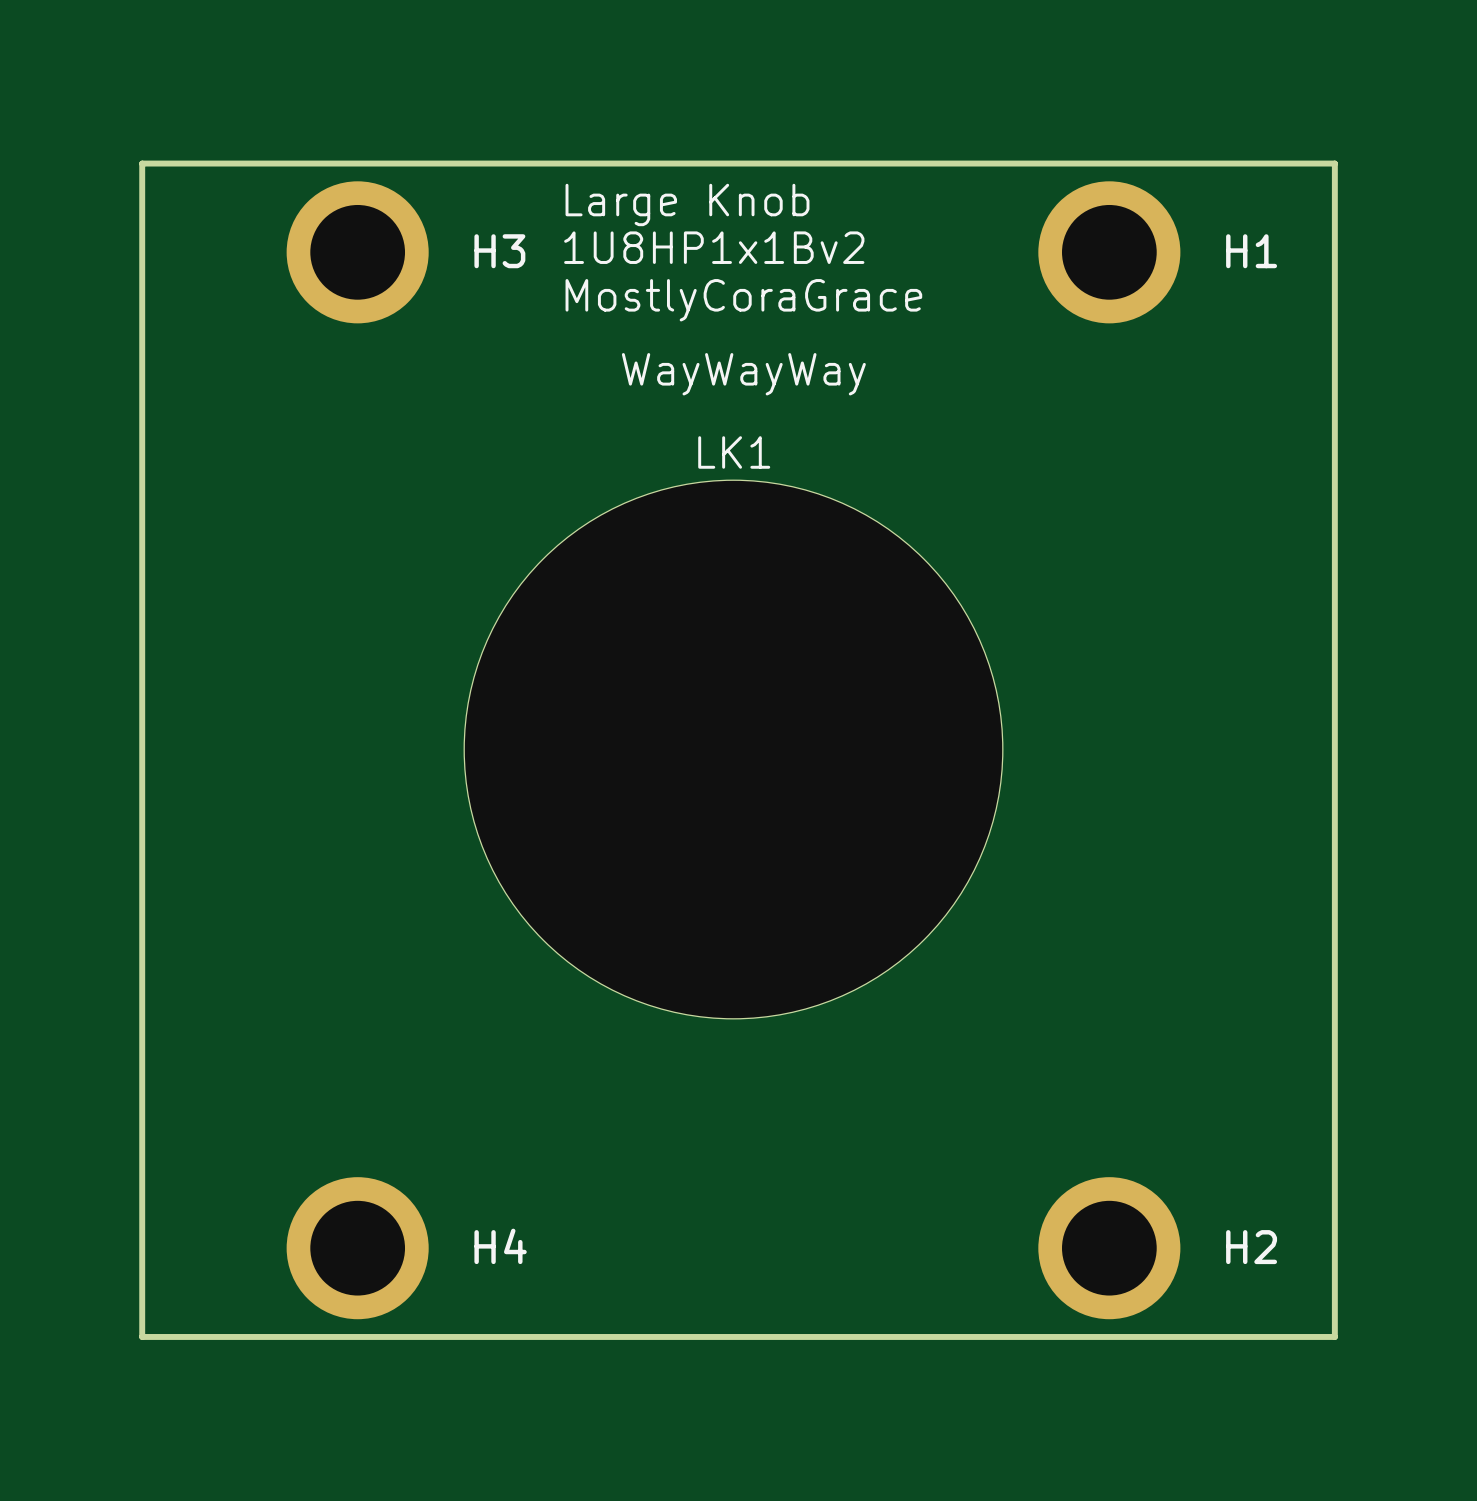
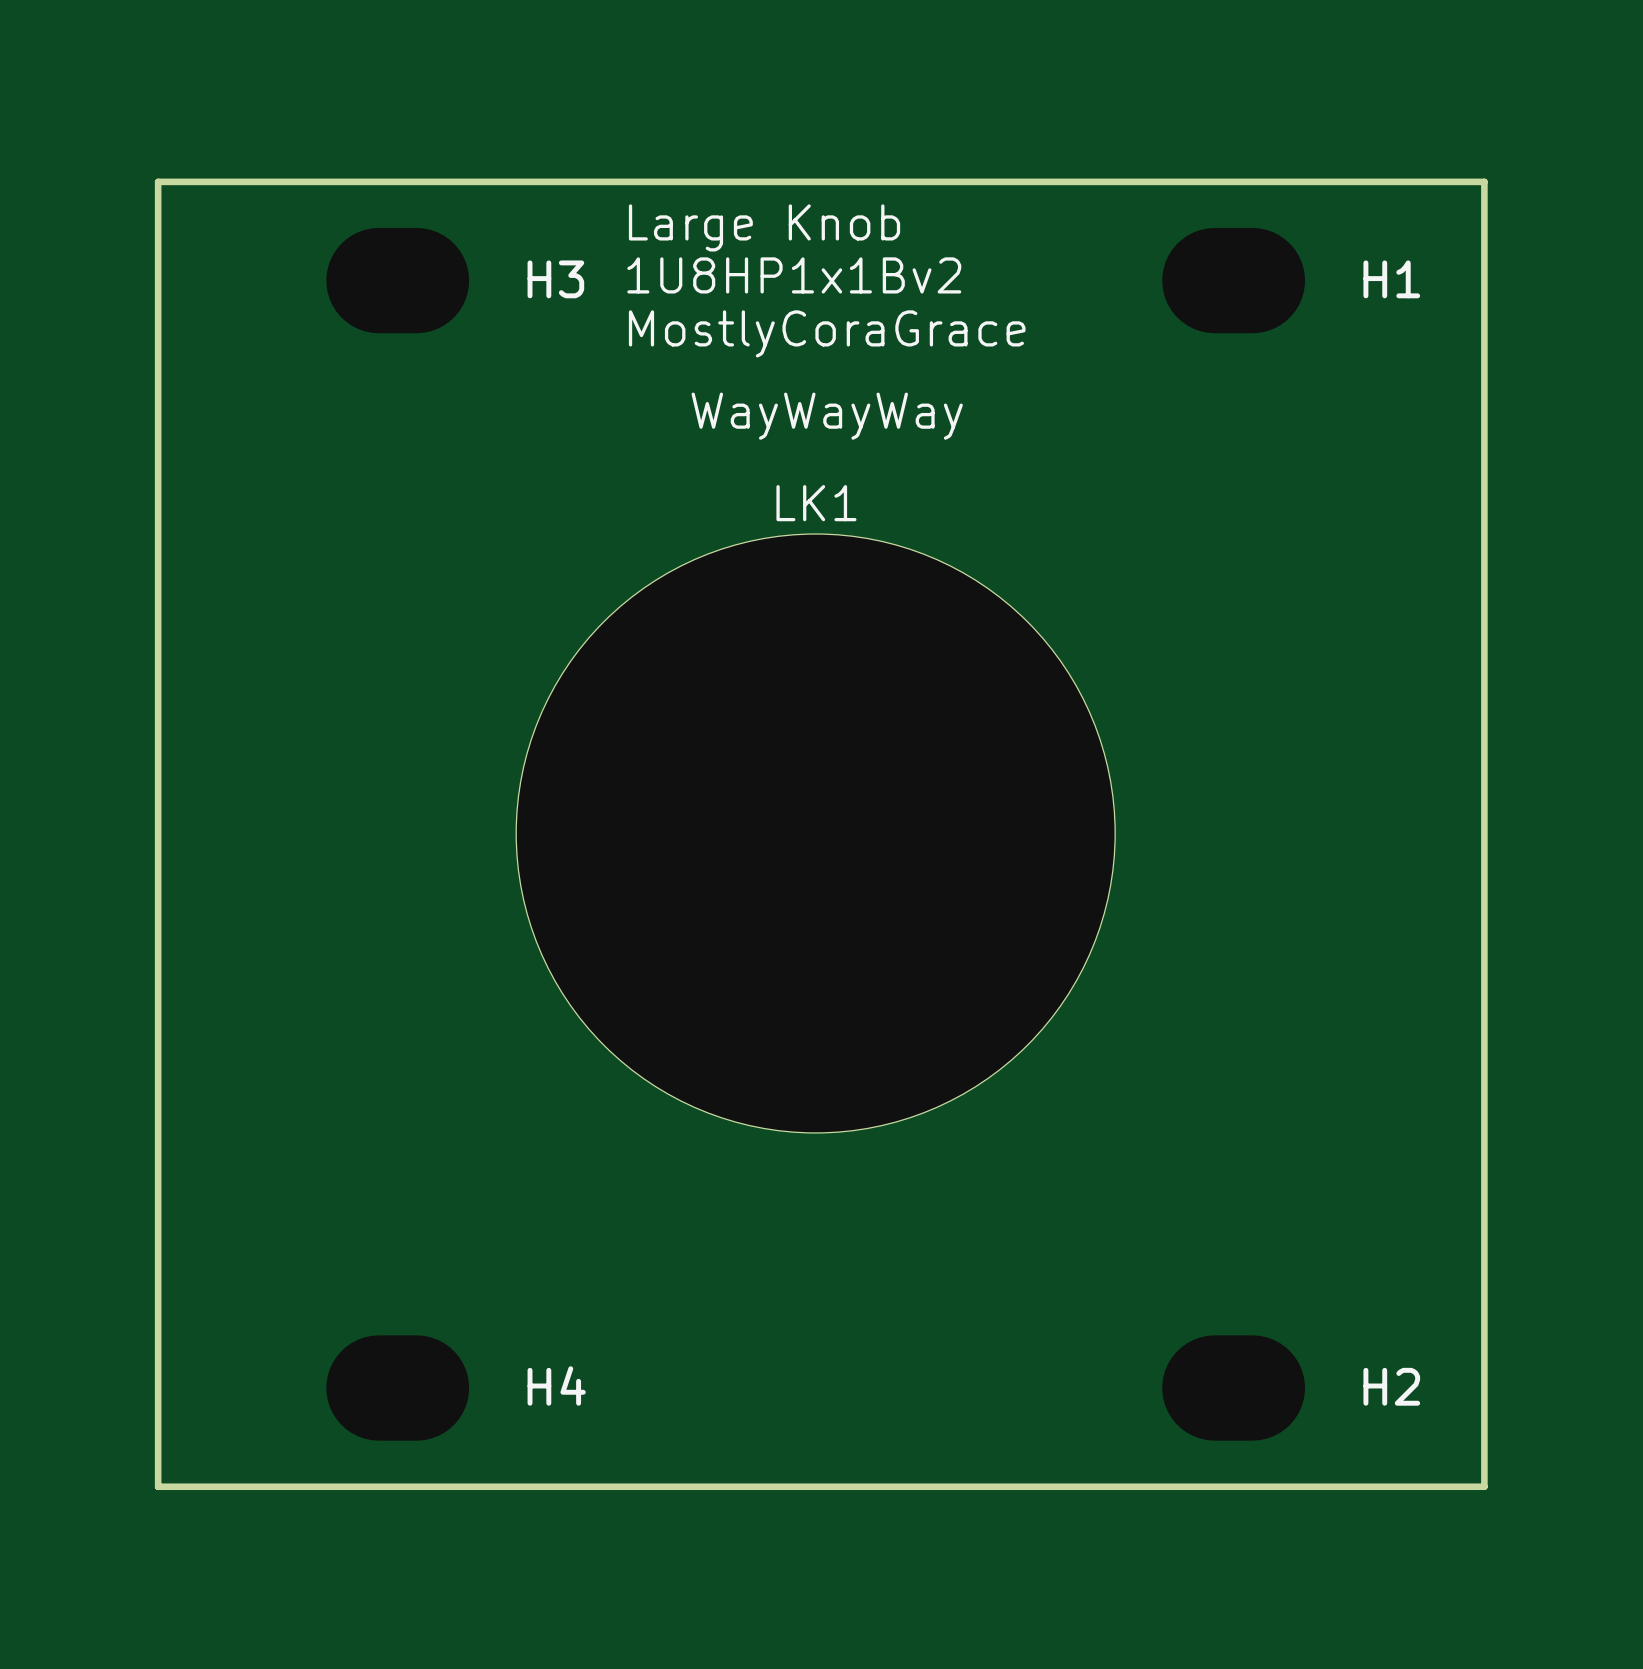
H3 footprint: [286, 181, 429, 324] -> [326, 227, 470, 334]
H1 footprint: [1038, 181, 1181, 324] -> [1162, 227, 1306, 334]
H4 footprint: [286, 1177, 429, 1320] -> [326, 1335, 470, 1441]
H2 footprint: [1038, 1177, 1181, 1320] -> [1162, 1335, 1306, 1441]

